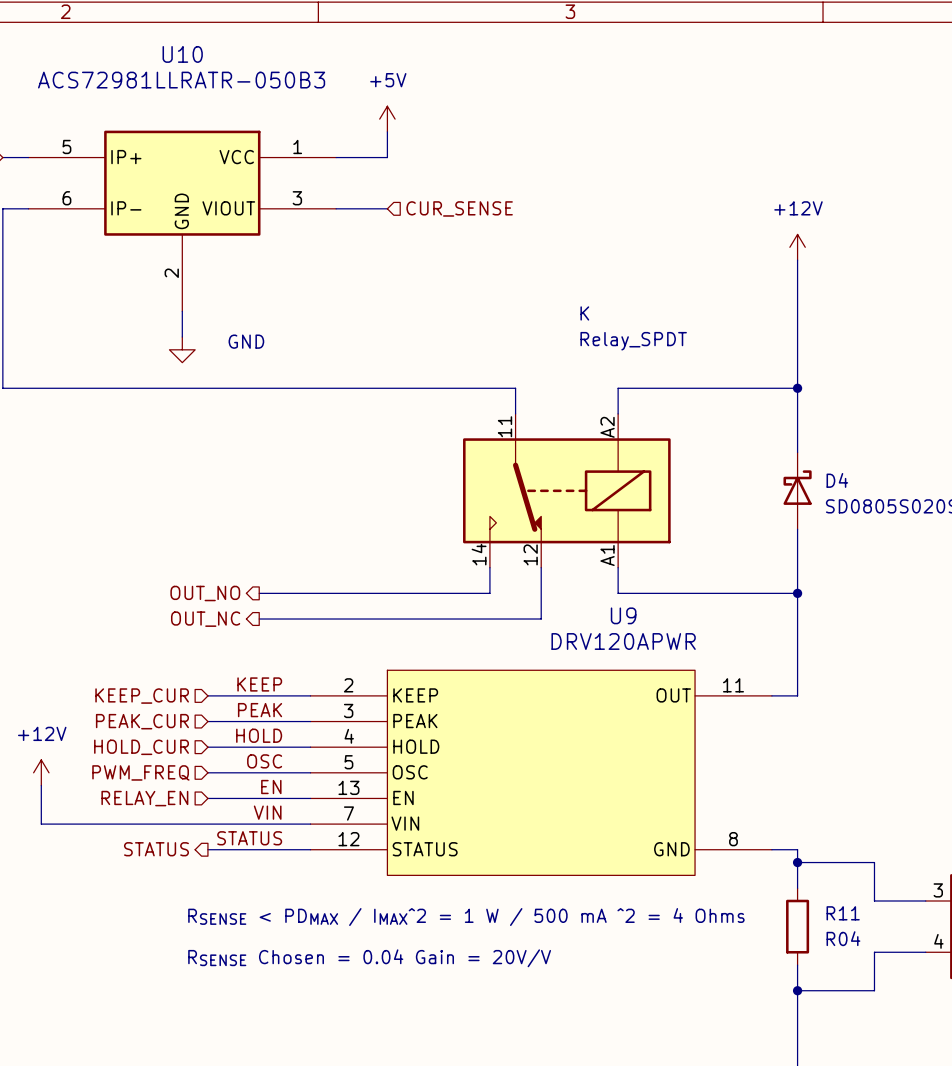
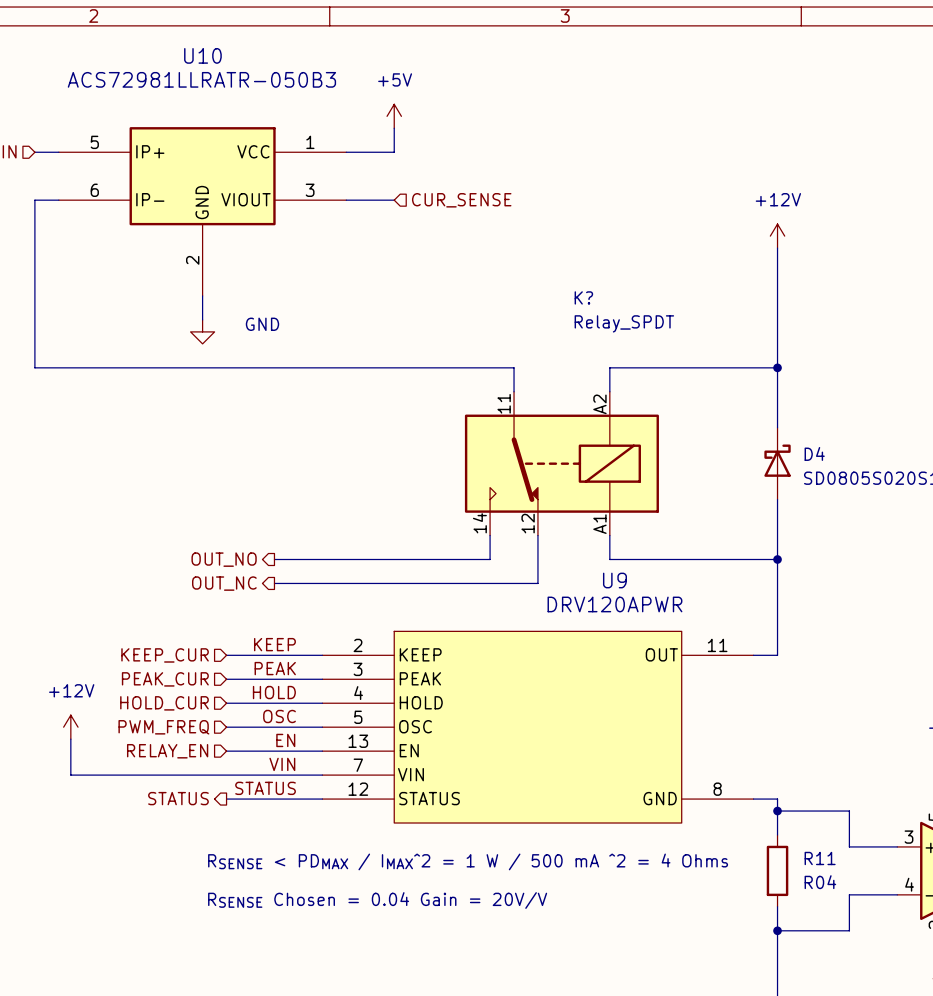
K name: K (584, 313) -> K? (583, 297)

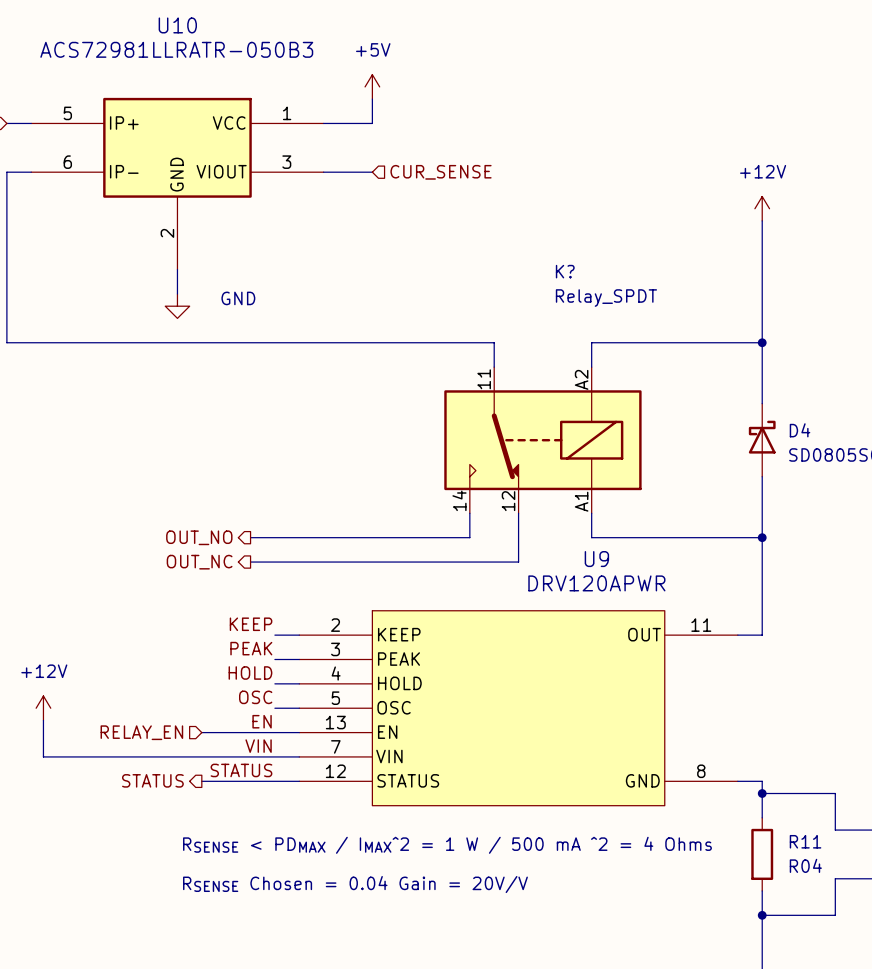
hierarchical label: KEEP_CUR (165, 655) -> none
wire: (226, 655) (298, 655) -> none
hierarchical label: PEAK_CUR (165, 679) -> none
wire: (226, 679) (298, 679) -> none
hierarchical label: HOLD_CUR (164, 703) -> none
wire: (226, 703) (298, 703) -> none
hierarchical label: PWM_FREQ (163, 727) -> none
wire: (226, 727) (298, 727) -> none

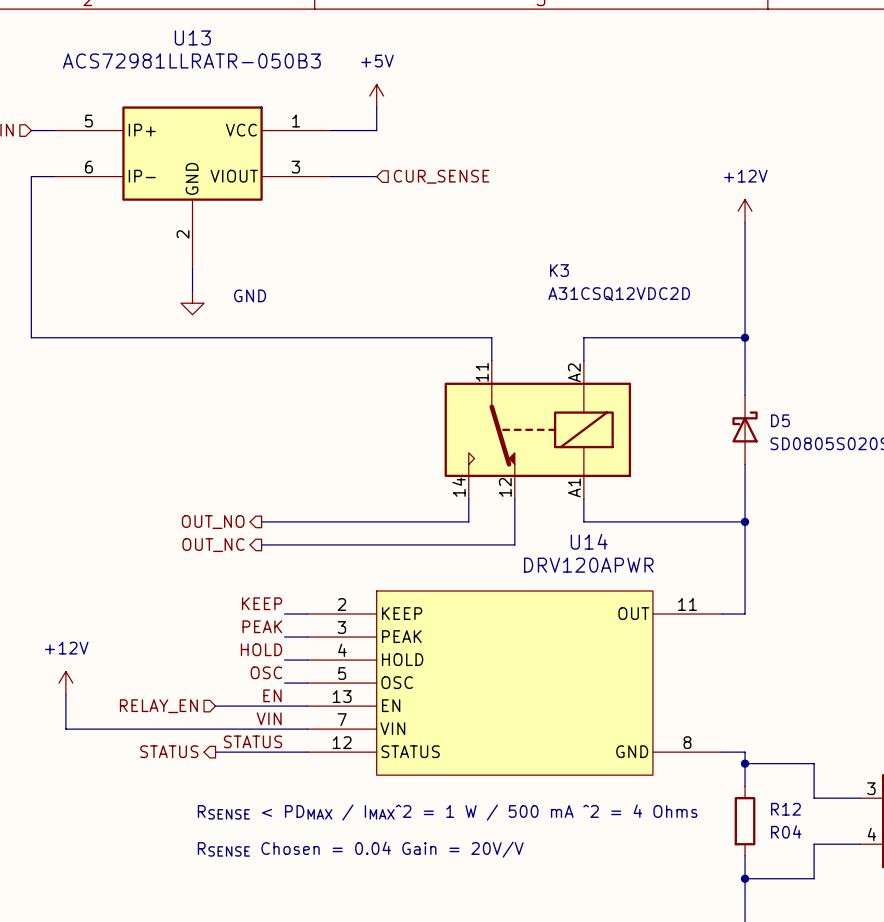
U10 name: U10 (177, 25) -> U13 (192, 37)
K? name: K? (565, 271) -> K3 (559, 270)
K? value: Relay_SPDT (606, 298) -> A31CSQ12VDC2D (619, 294)
D4 name: D4 (800, 430) -> D5 (780, 420)
U9 name: U9 (596, 559) -> U14 (589, 541)
R11 name: R11 (805, 841) -> R12 (785, 809)

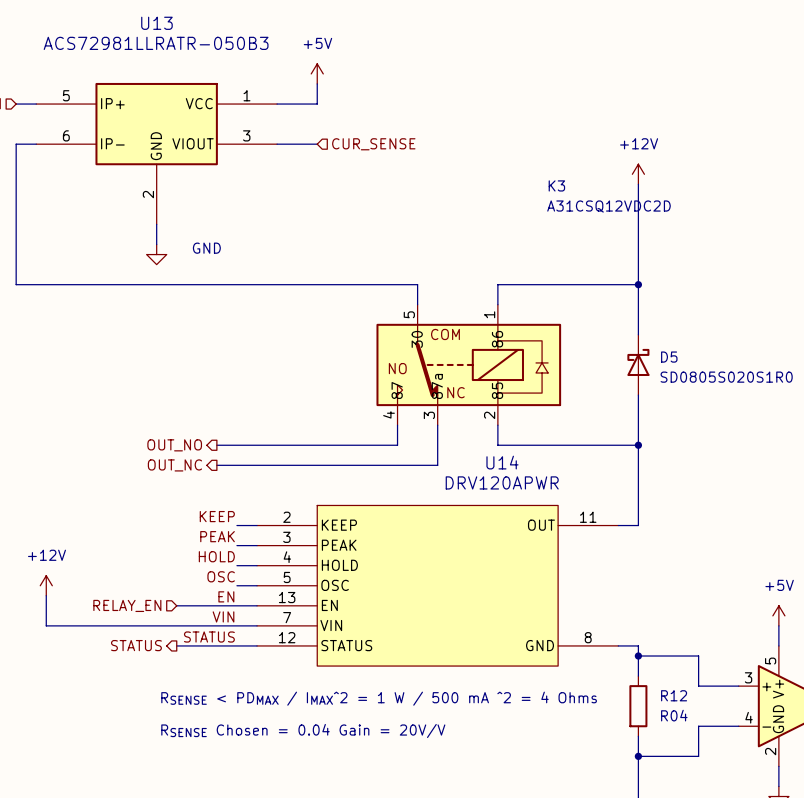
K3 name position: K3 (559, 270) -> K3 (556, 185)
K3 value position: A31CSQ12VDC2D (619, 294) -> A31CSQ12VDC2D (608, 206)
K3 symbol: [444, 360, 632, 499] -> [376, 304, 562, 426]

